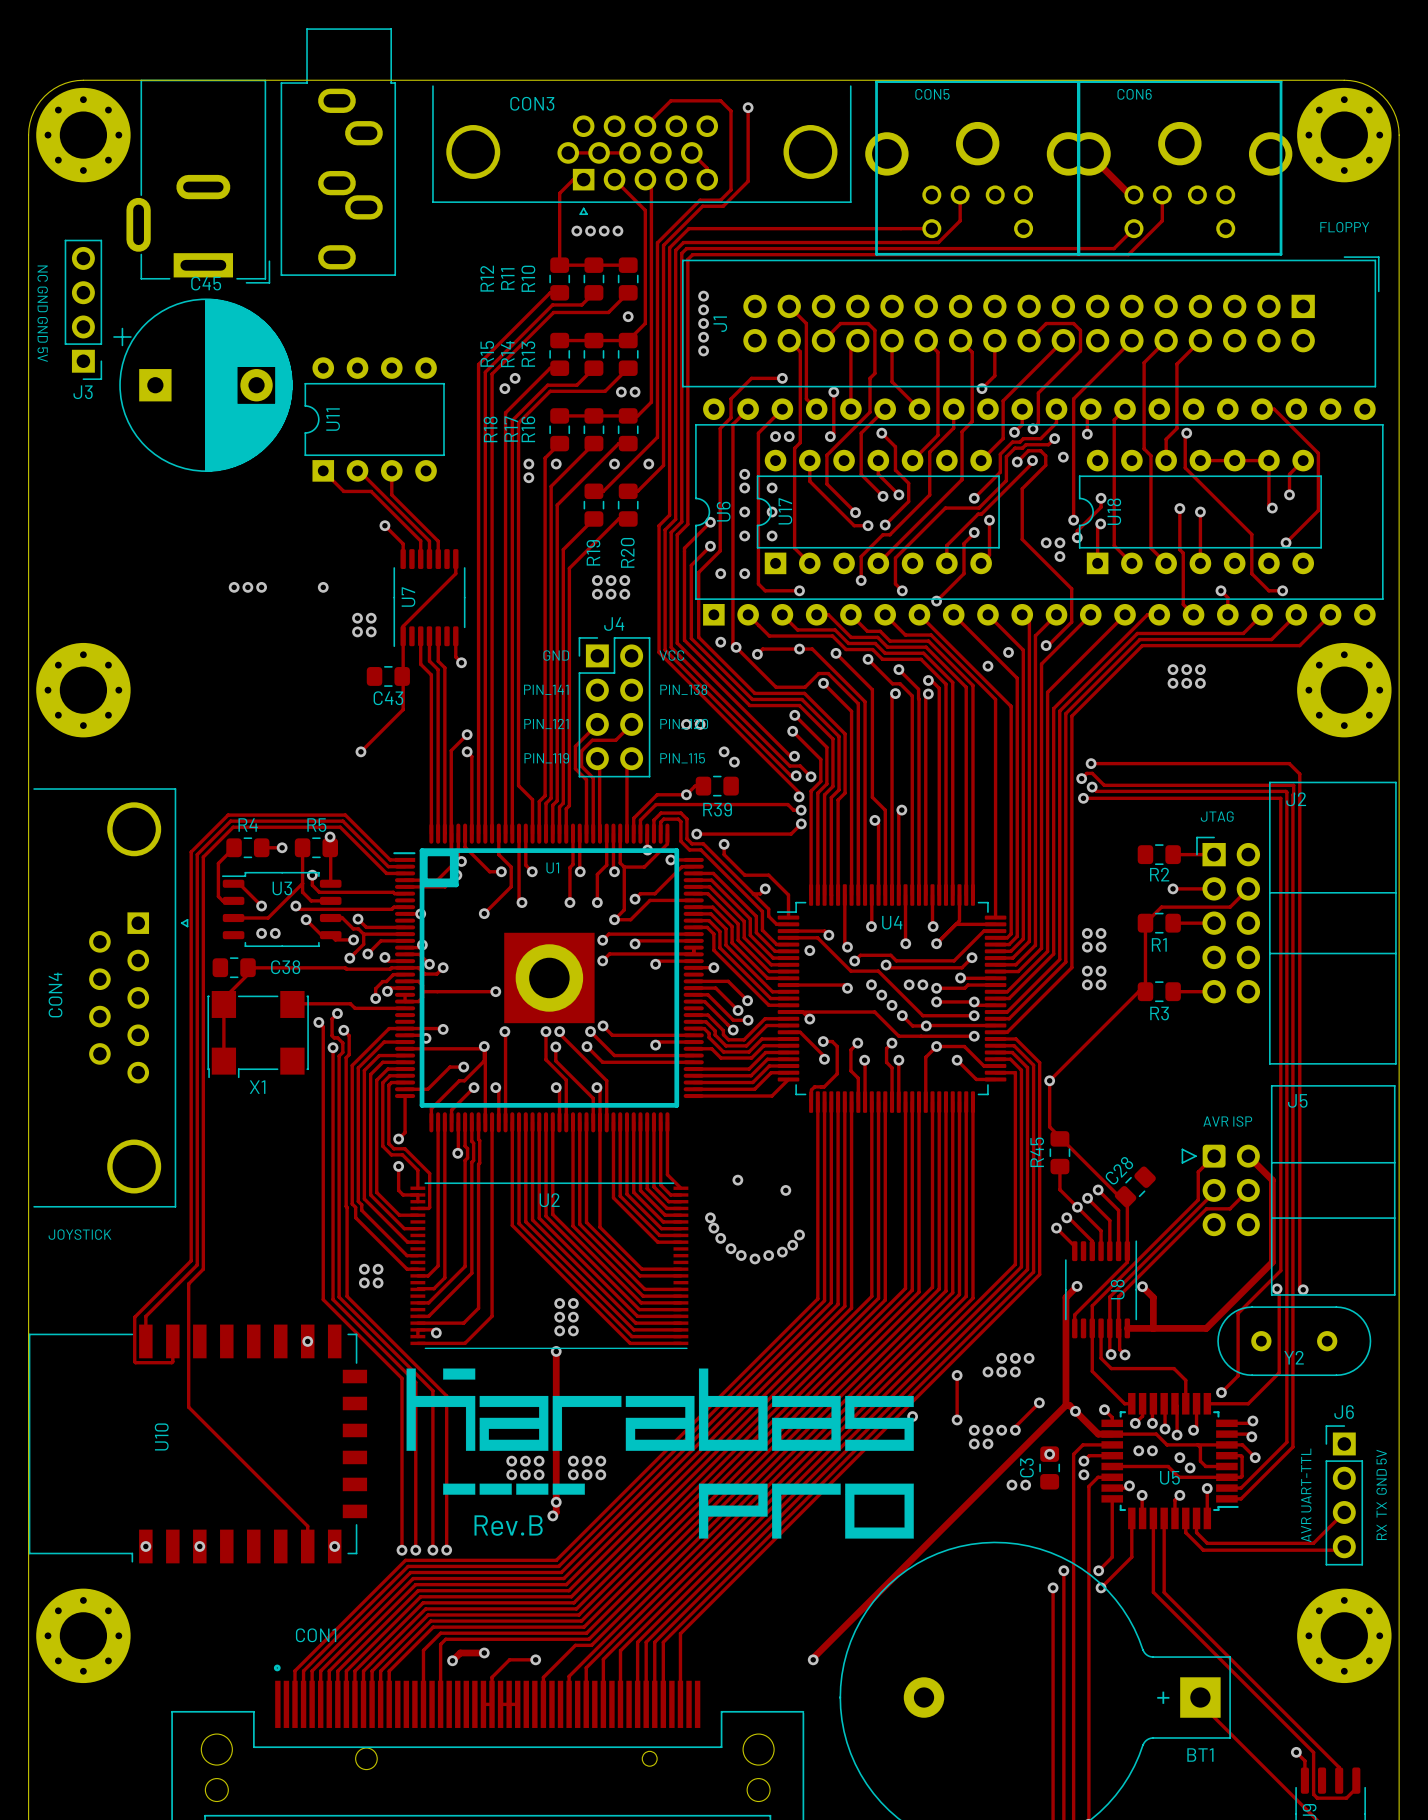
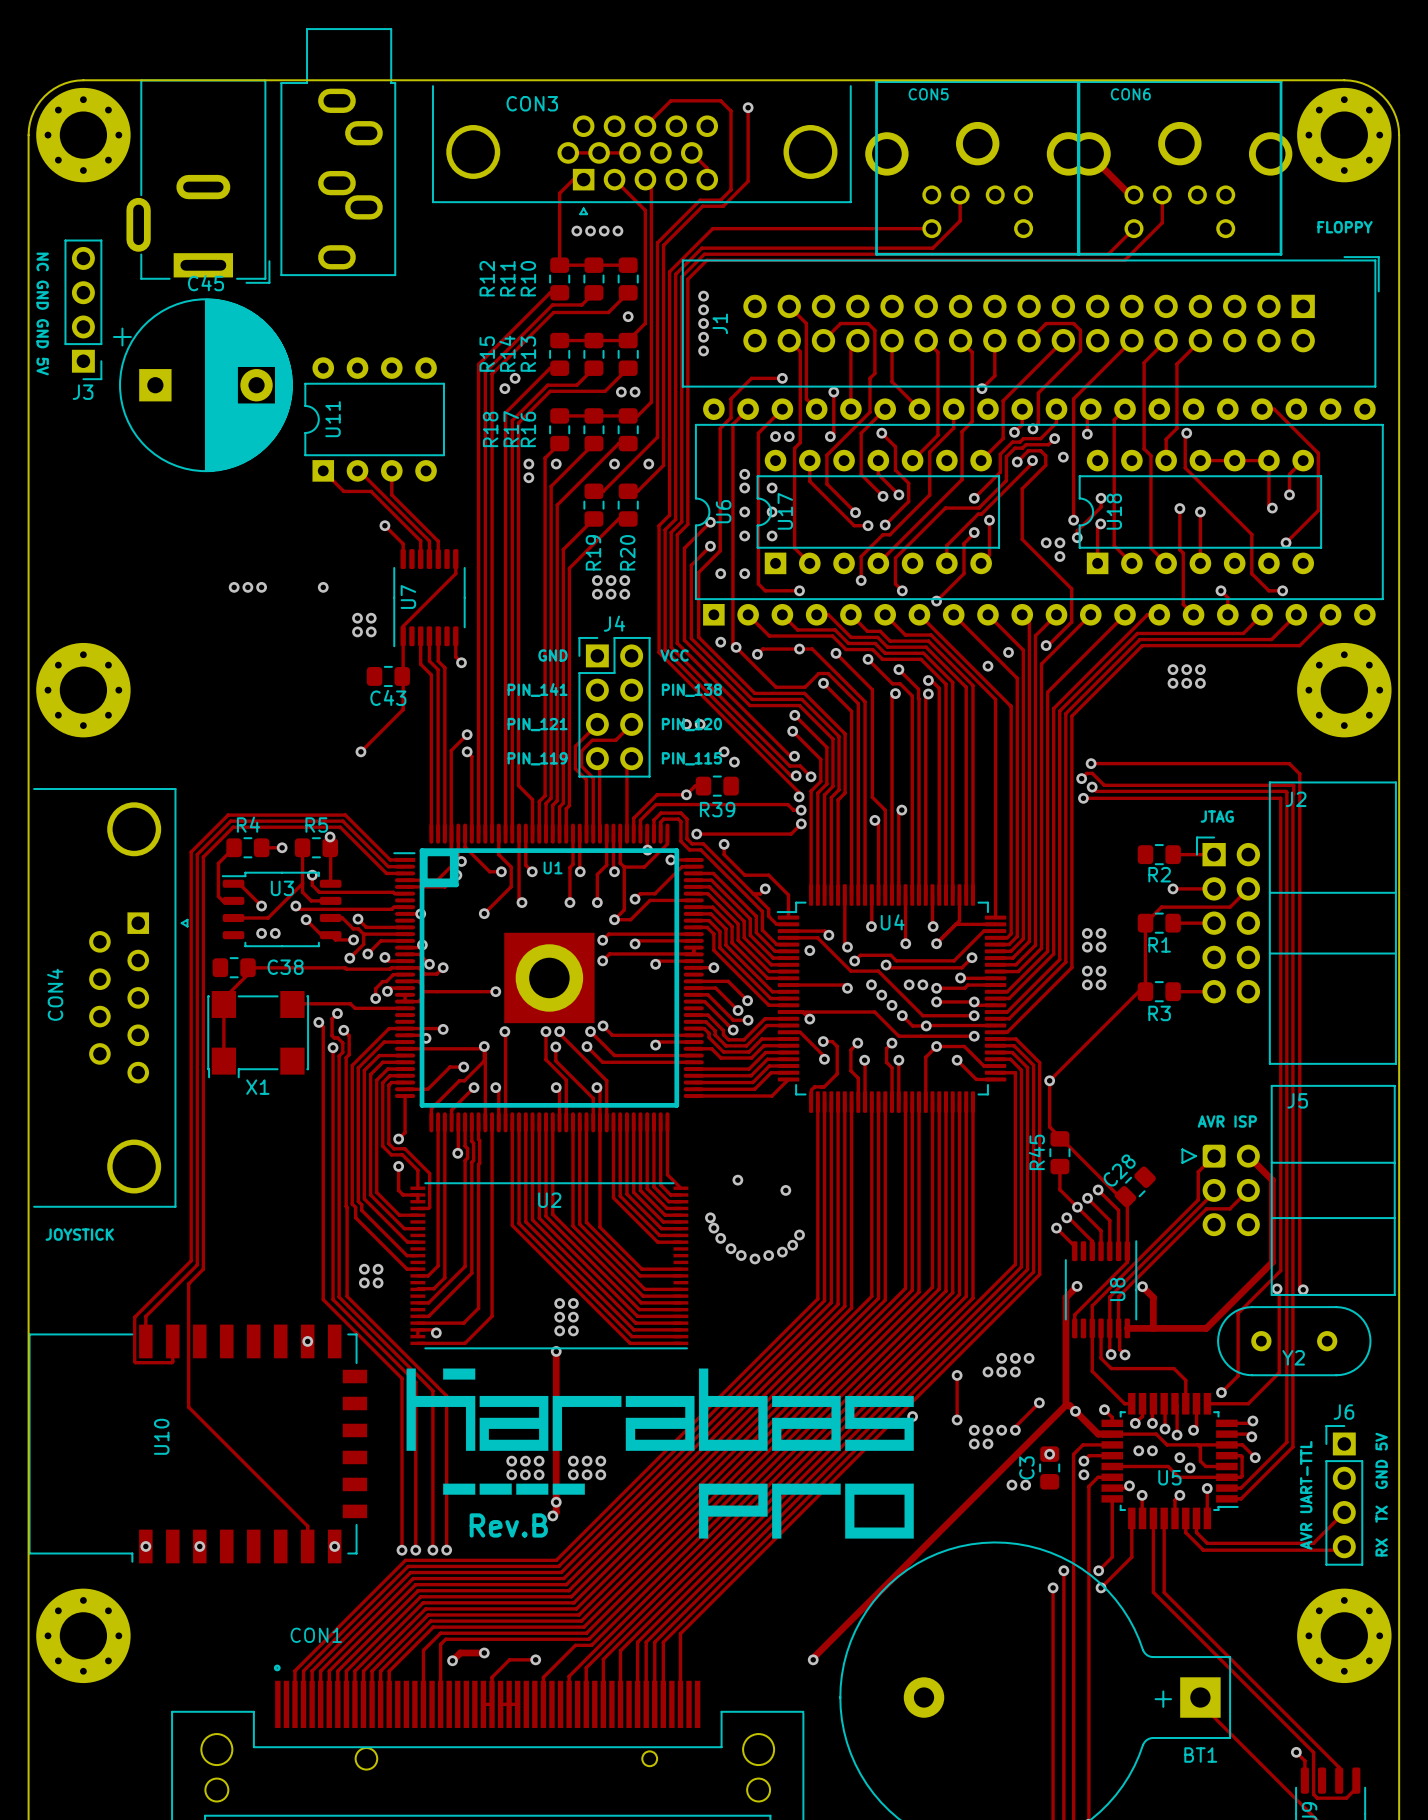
track: (1162, 220) (1128, 254) (692, 254) (687, 259) (687, 279) -> (1162, 220) (1124, 260) (706, 260) (687, 279)
track: (712, 228) (688, 228) (669, 247) (669, 271) -> (712, 228) (669, 271)
track: (938, 242) (683, 242) (675, 250) (675, 274) -> (938, 242) (932, 248) (701, 248) (675, 274)
track: (1114, 248) (686, 248) (681, 253) (681, 276) -> (1114, 248) (1108, 254) (704, 254) (681, 276)

